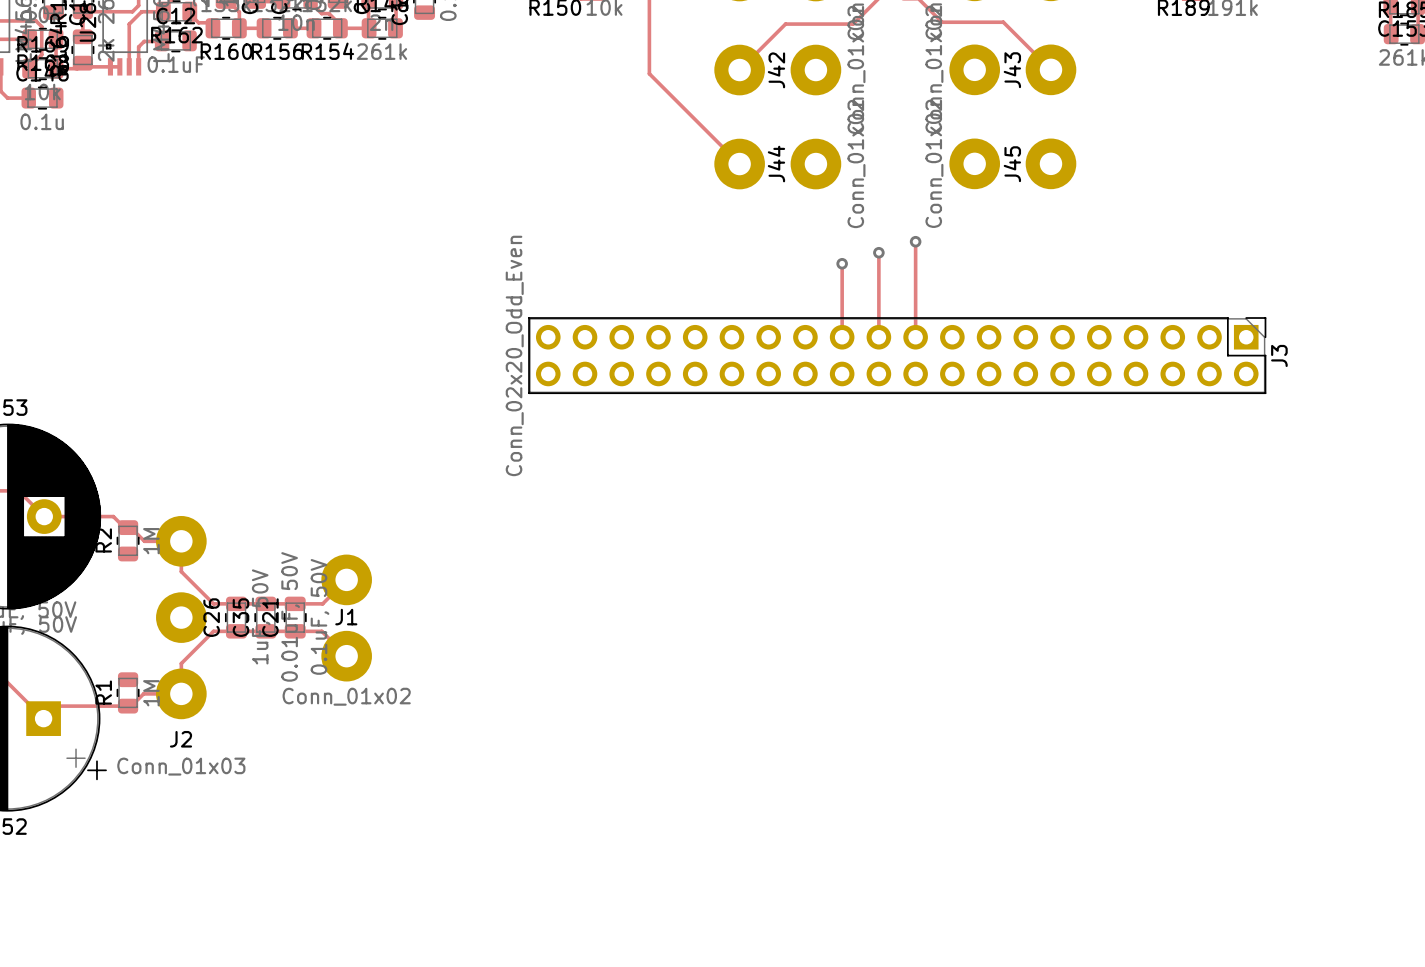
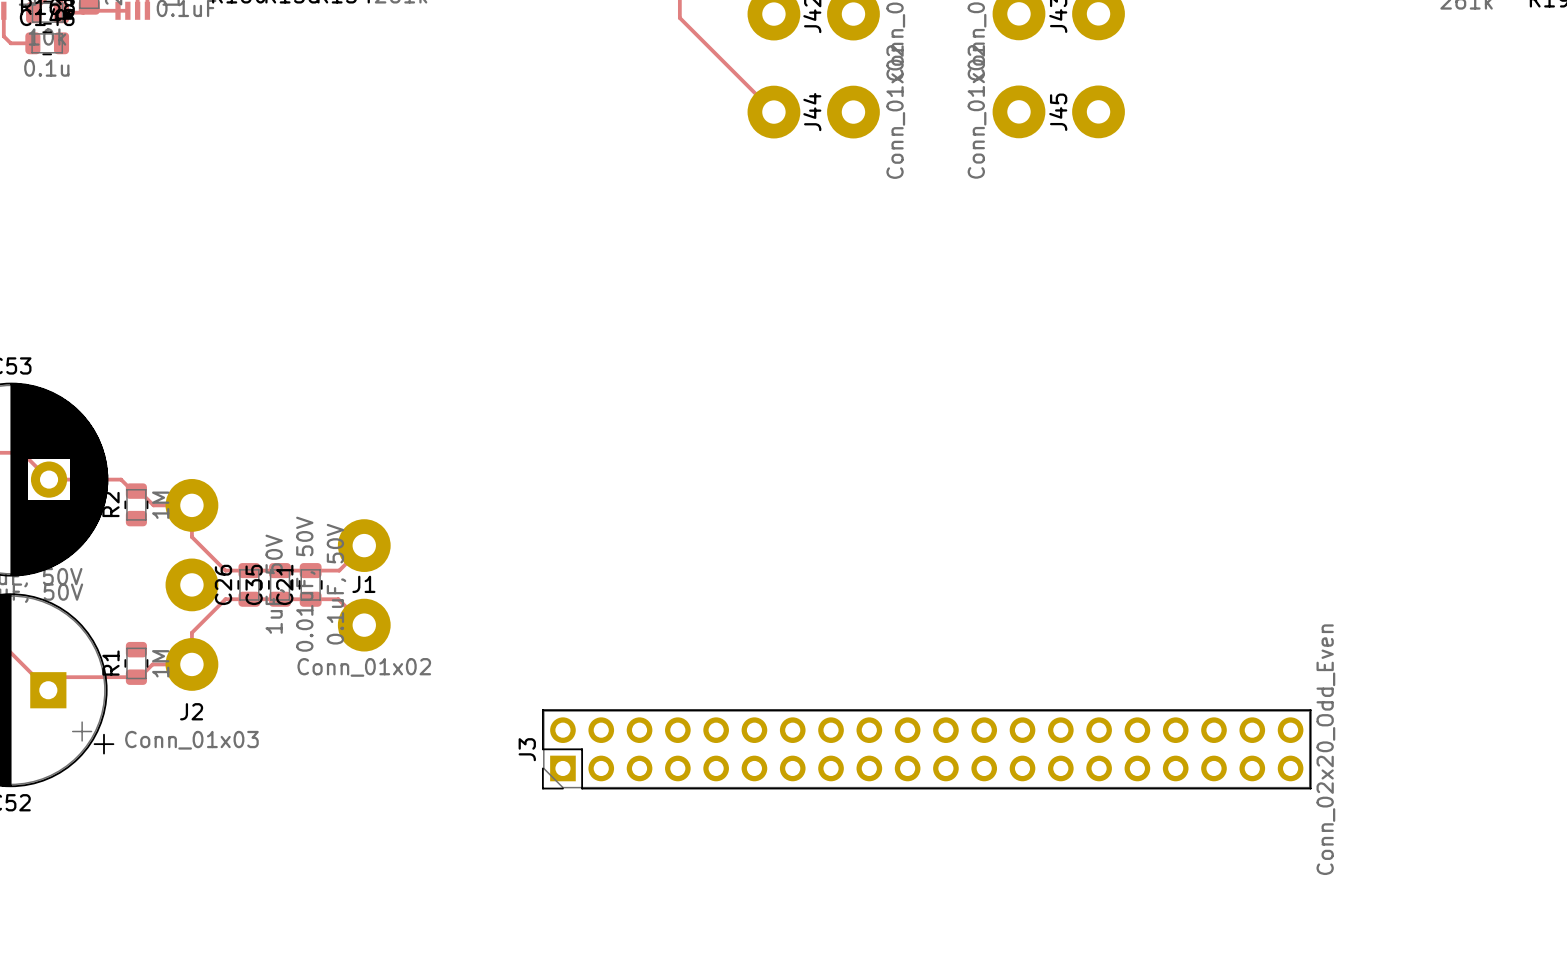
track: (915, 241) (915, 337) -> none
via: (915, 241) -> none
track: (878, 252) (878, 337) -> none
via: (878, 252) -> none
track: (842, 263) (842, 337) -> none
via: (842, 263) -> none
J3 rotation: 0° (897, 355) -> 180° (926, 749)

